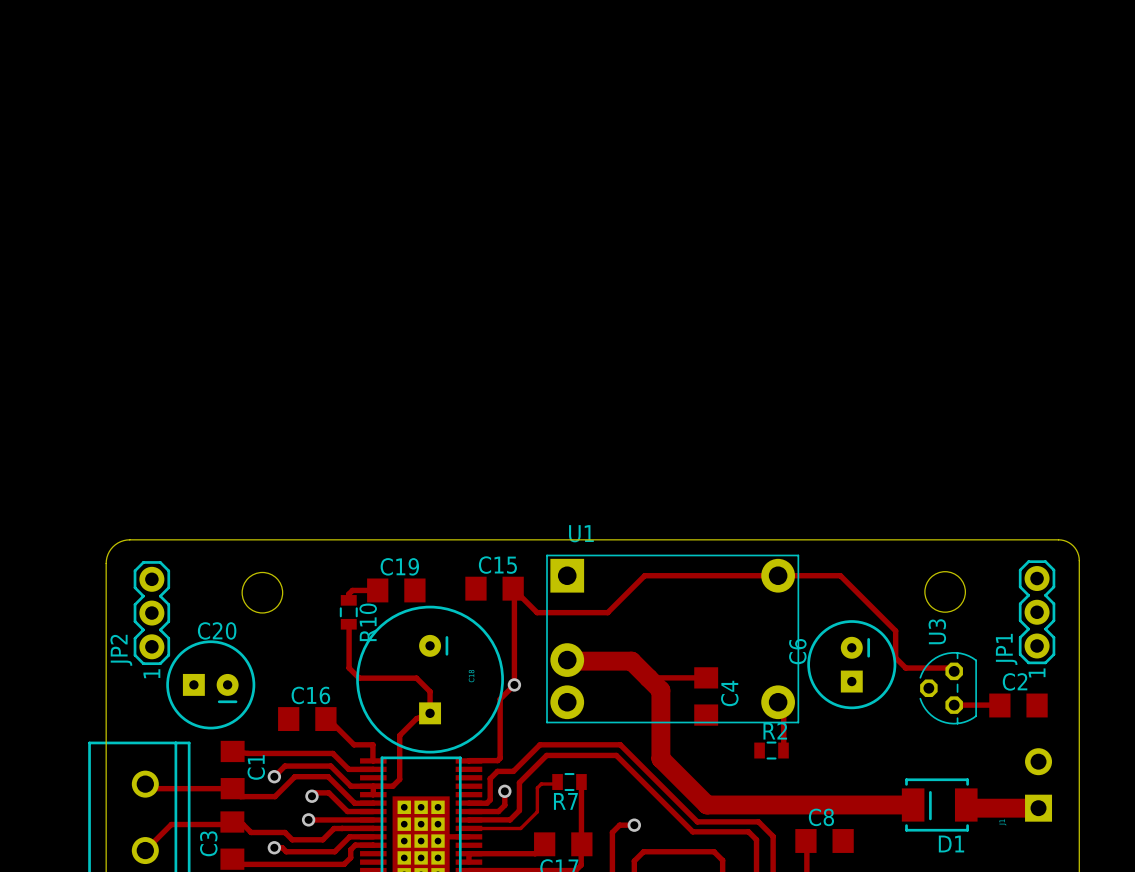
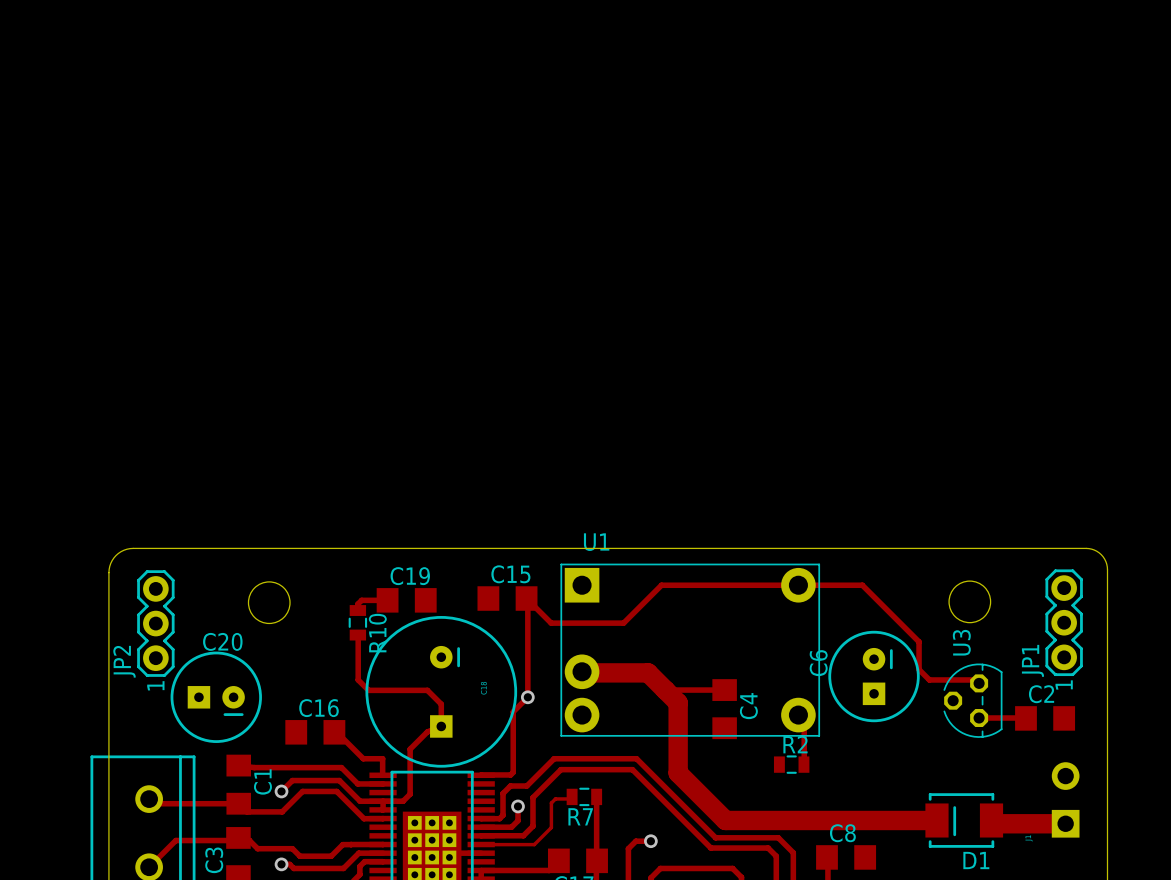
track: (311, 796) (315, 792) (328, 792) (347, 811) (373, 811) -> none
via: (311, 796) -> none
track: (308, 819) (373, 819) -> none
via: (308, 819) -> none

